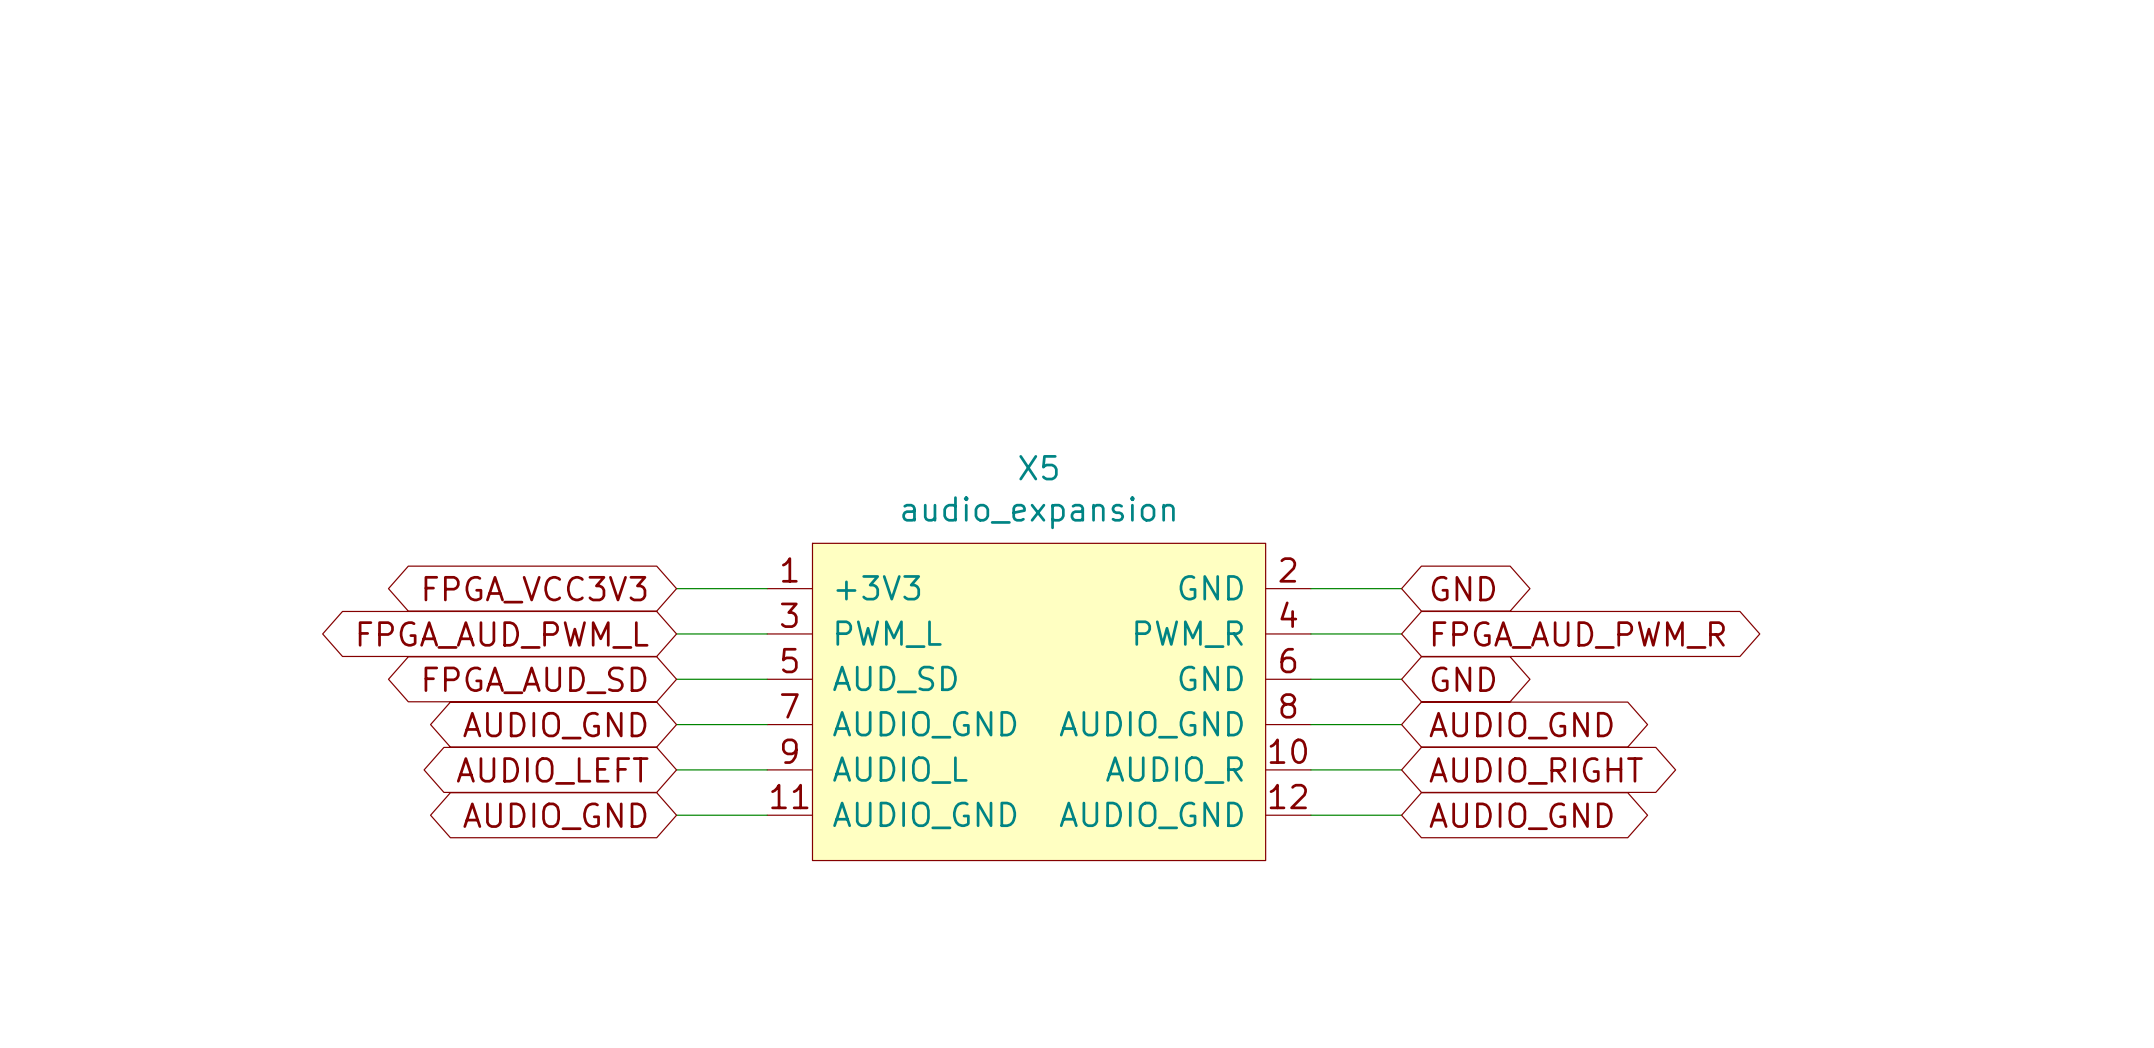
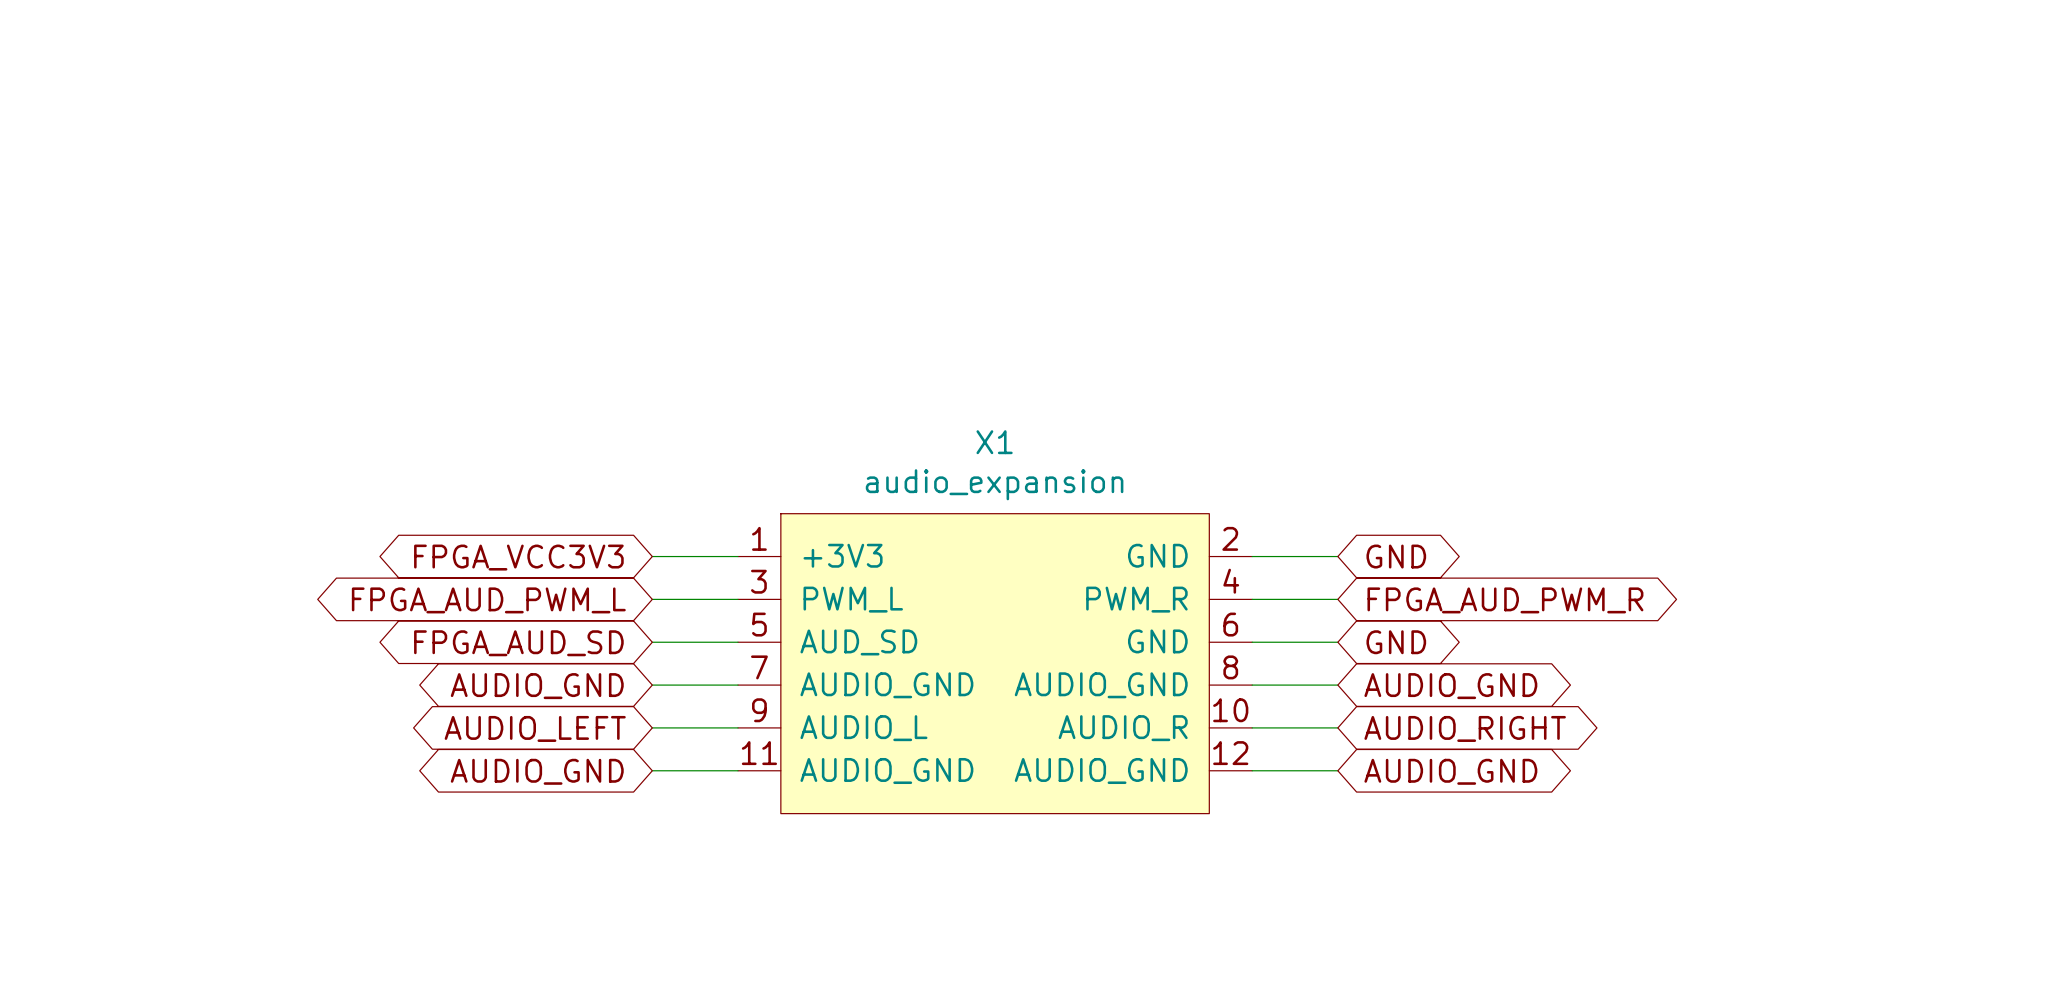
X5 name: X5 (1038, 467) -> X1 (994, 442)

